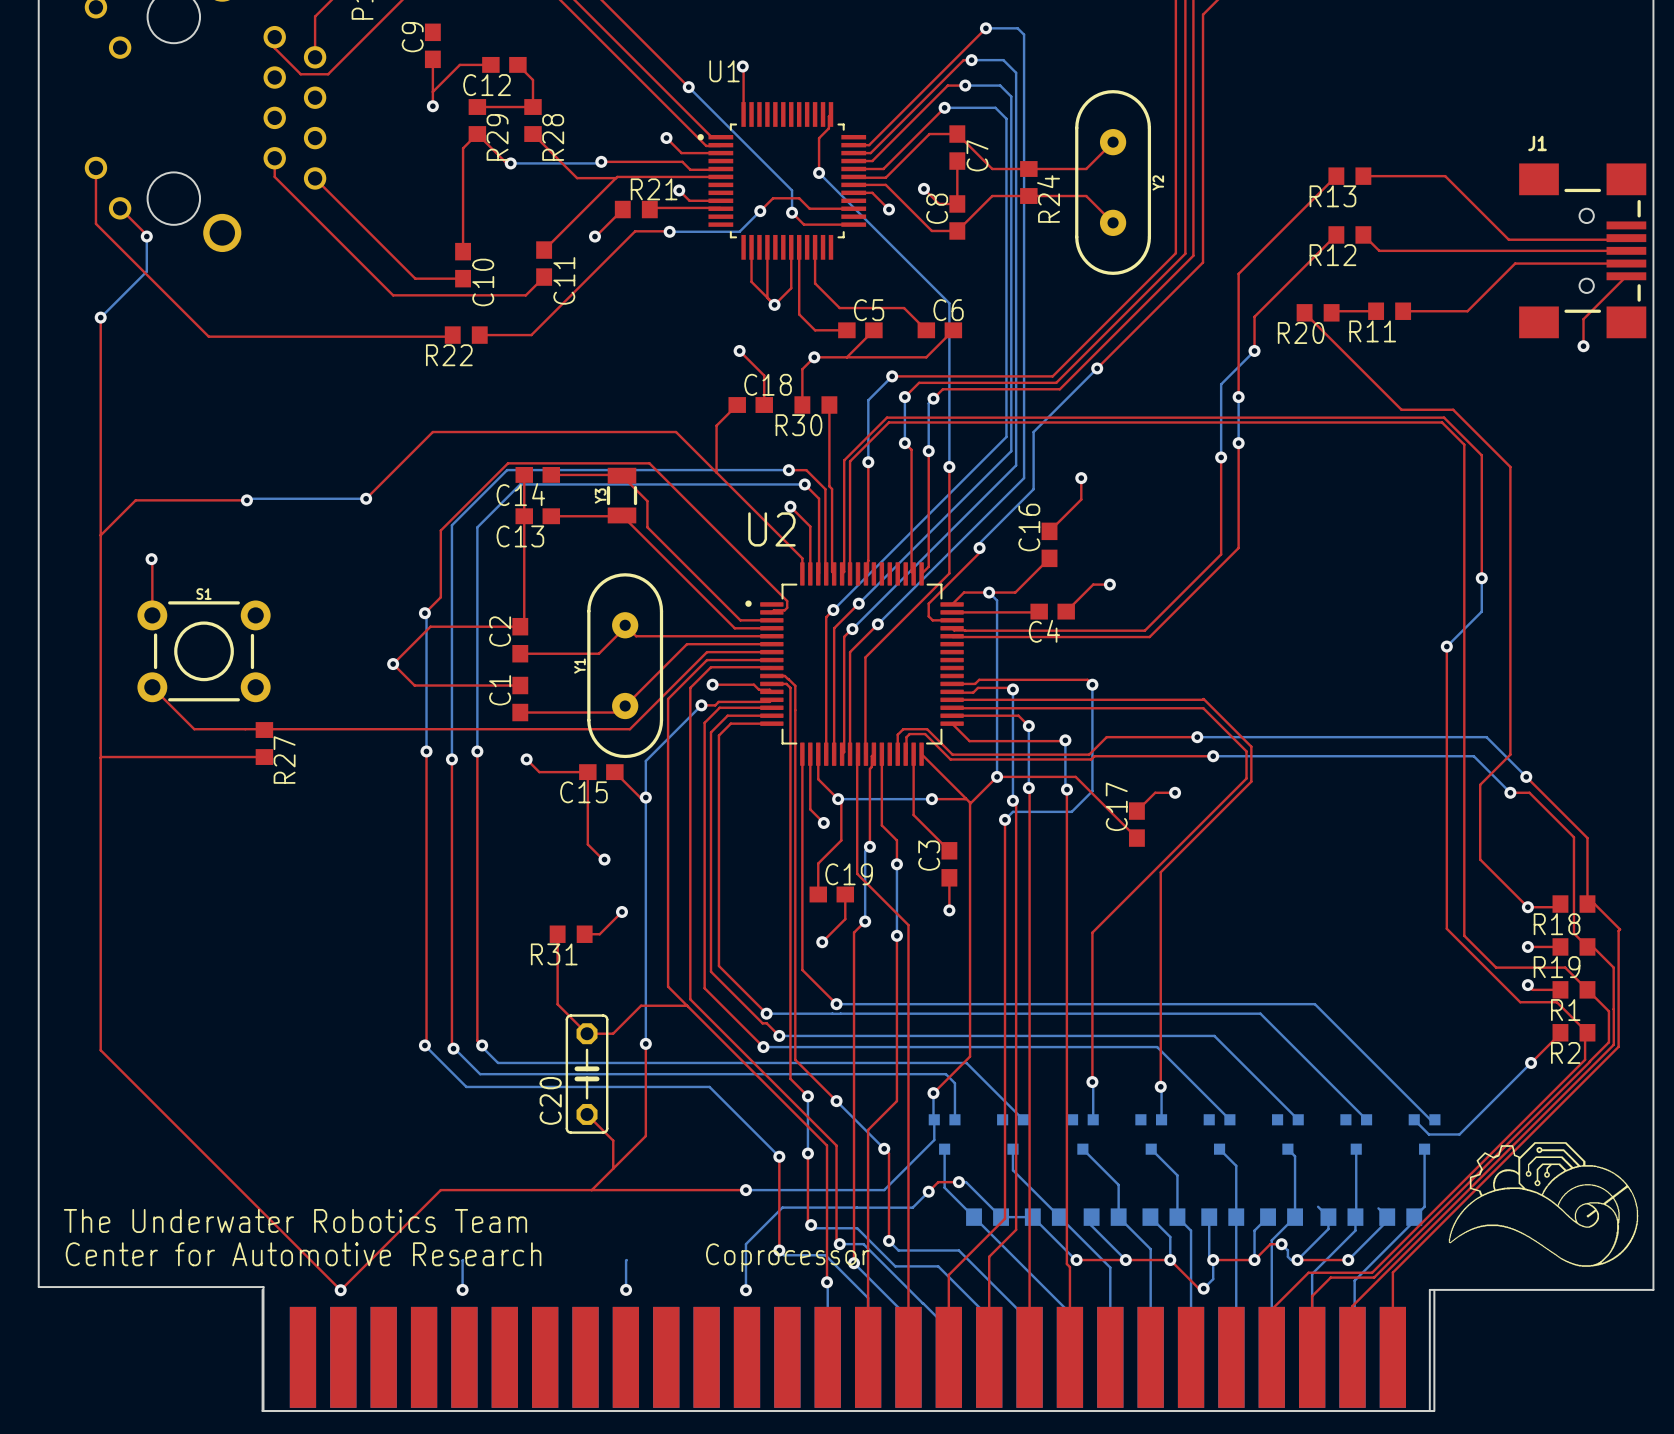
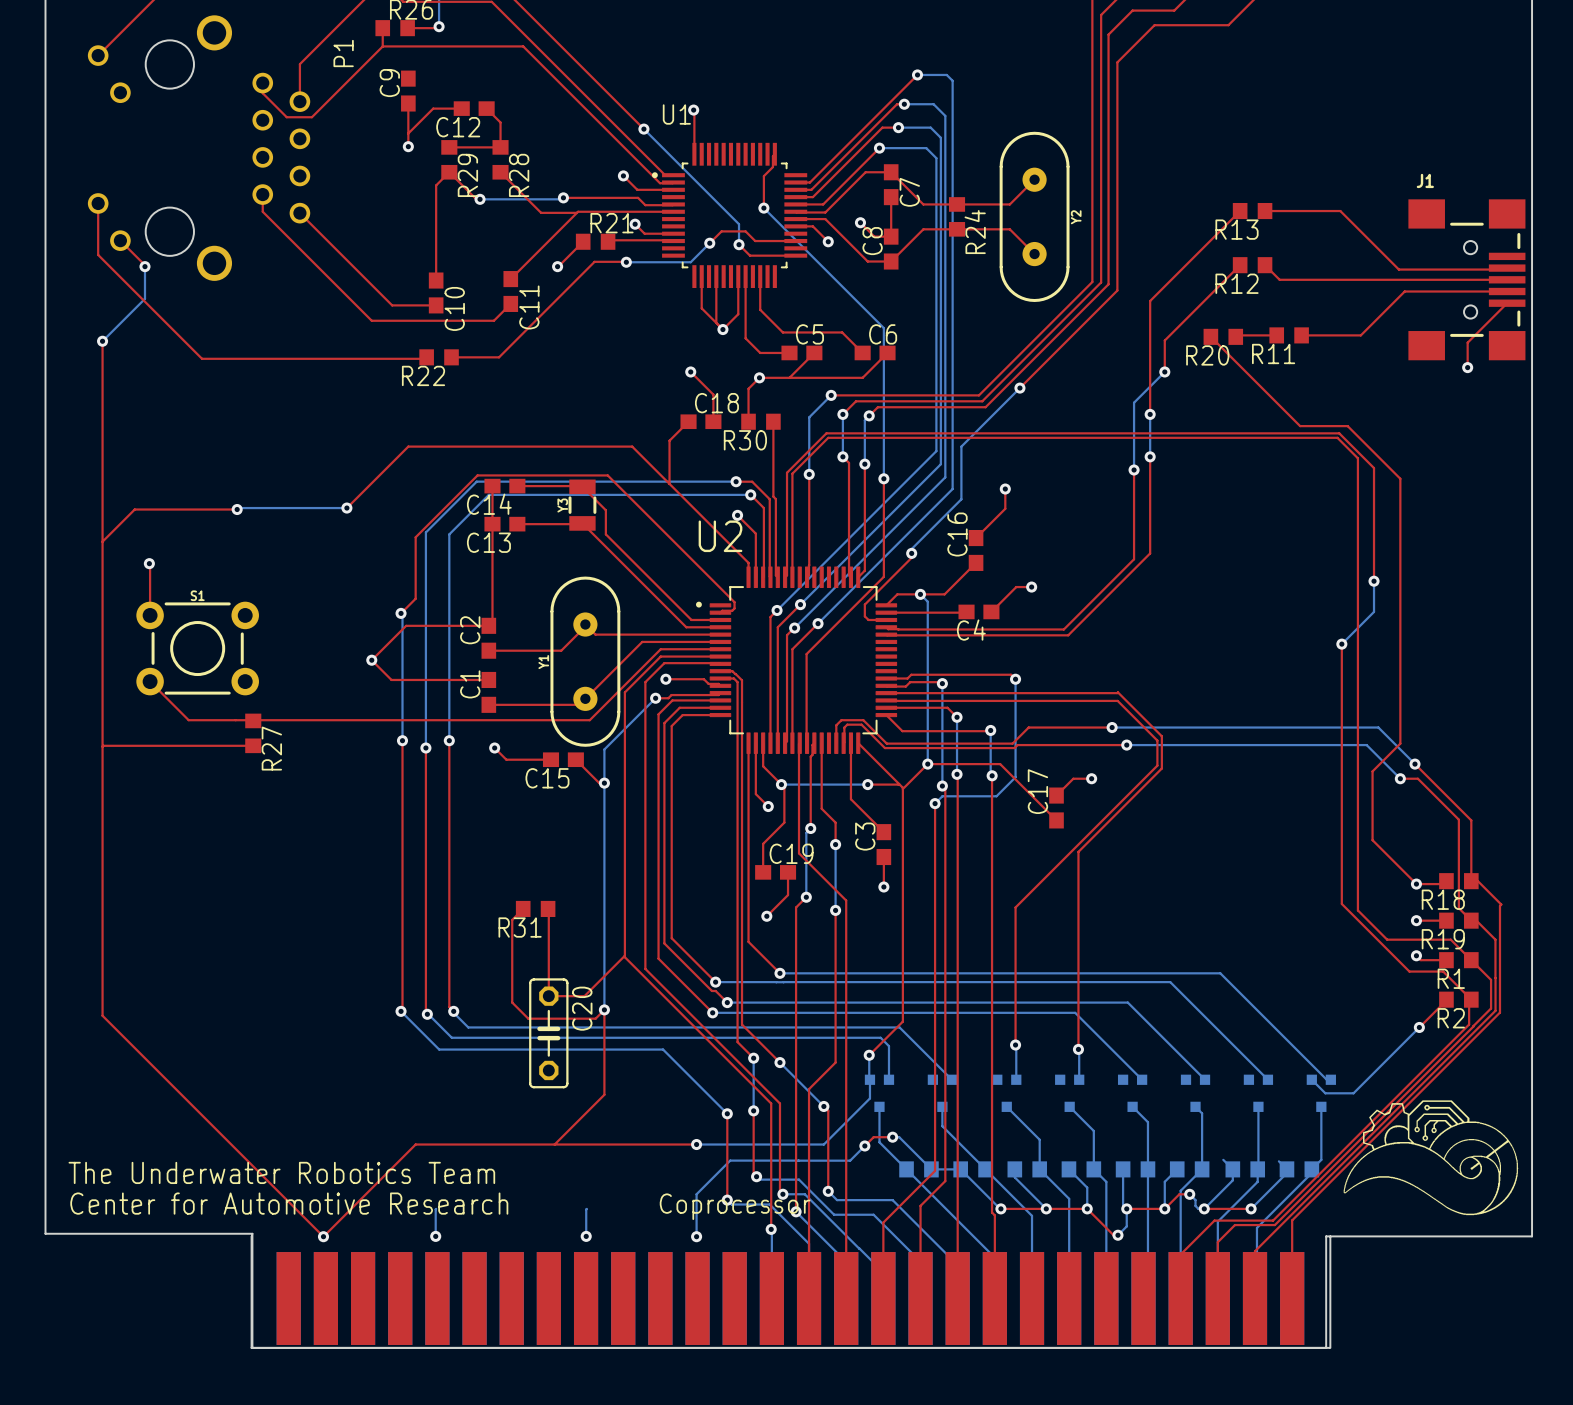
top track: (587, 772) (587, 844) (604, 859) -> none
via: (604, 859) -> none
top track: (622, 911) (599, 934) (584, 934) -> (624, 955) (584, 996) (548, 996) (548, 908)
via: (622, 911) -> none
top track: (557, 934) (557, 1004) (587, 1033) (613, 1033) (641, 1005) (687, 1005) -> (523, 908) (512, 919) (512, 1002) (528, 1018) (595, 1018) (604, 1009)
C20 rotation: 0° (587, 1074) -> 180° (548, 1033)
top track: (587, 1114) (613, 1140) (613, 1168) -> none

